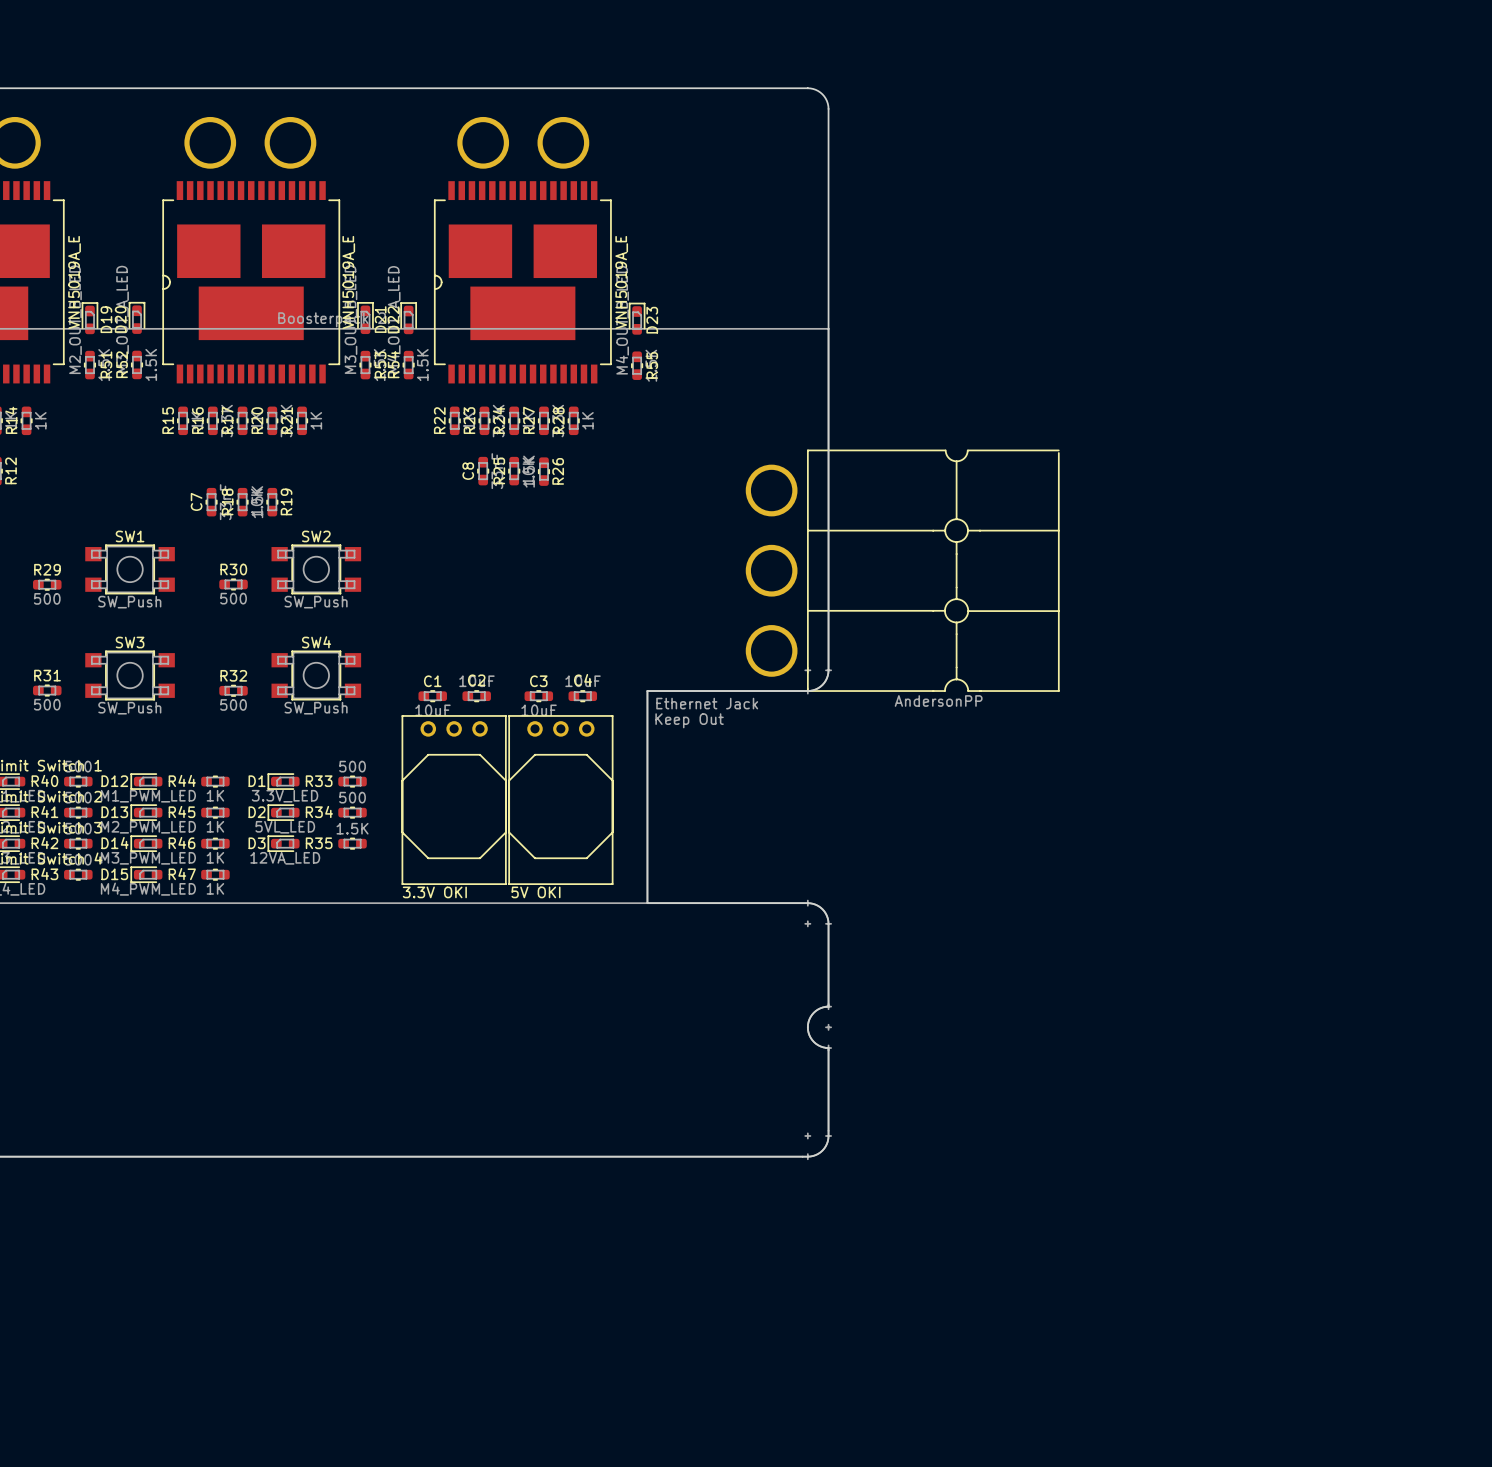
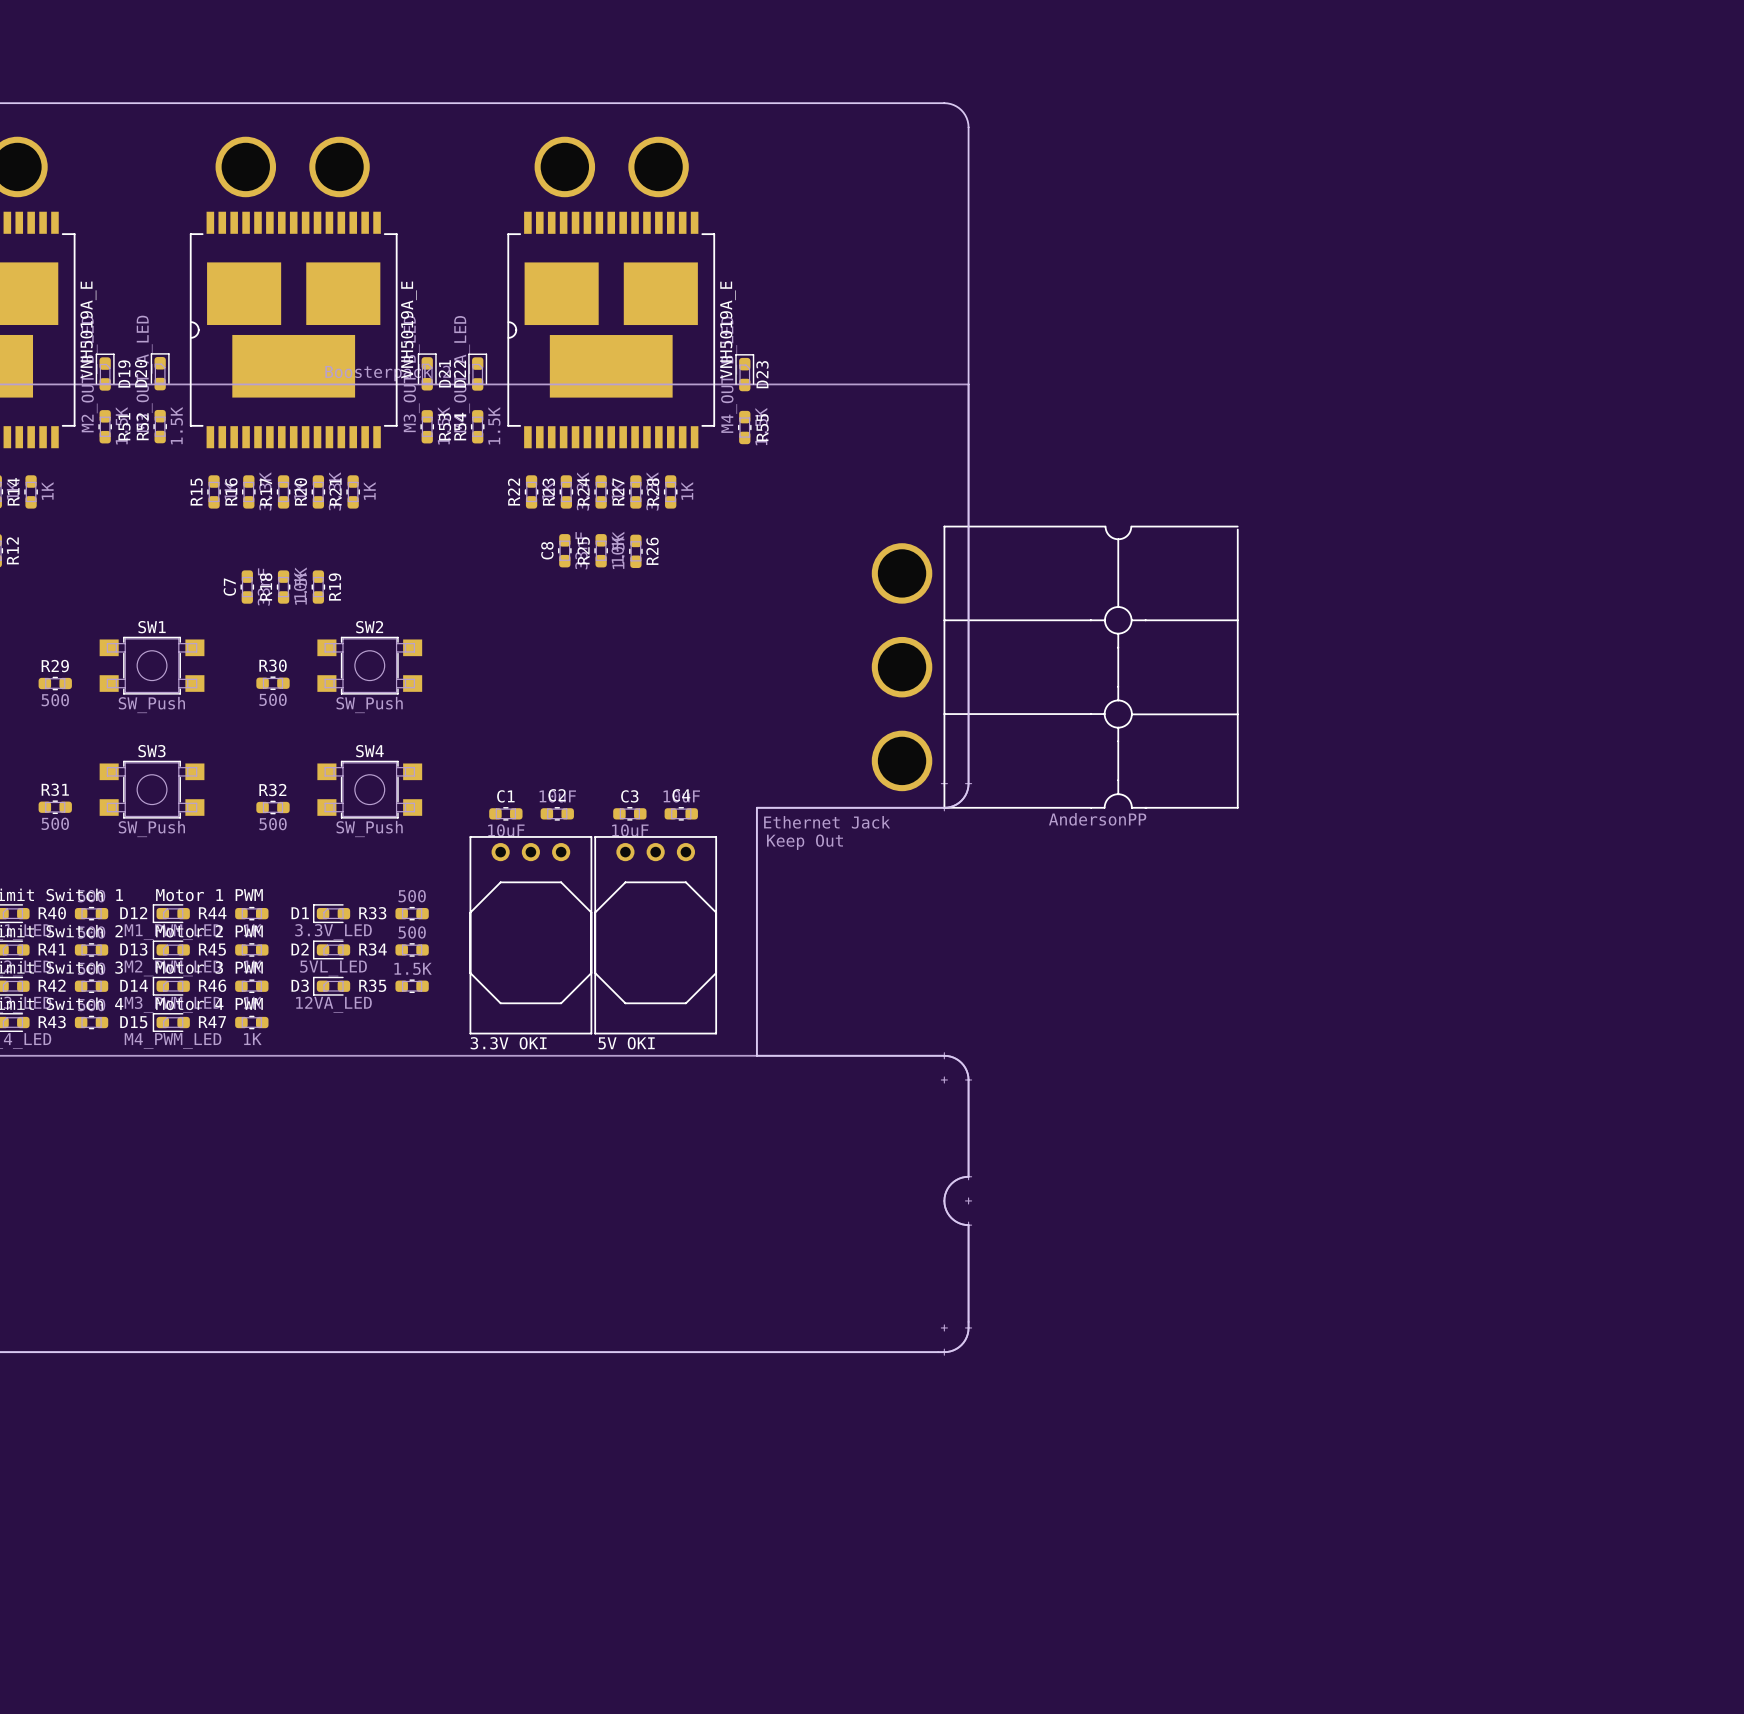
text: none -> Motor 1 PWM (209, 895)
text: none -> Motor 2 PWM (209, 931)
text: none -> Motor 3 PWM (209, 967)
text: none -> Motor 4 PWM (209, 1004)

